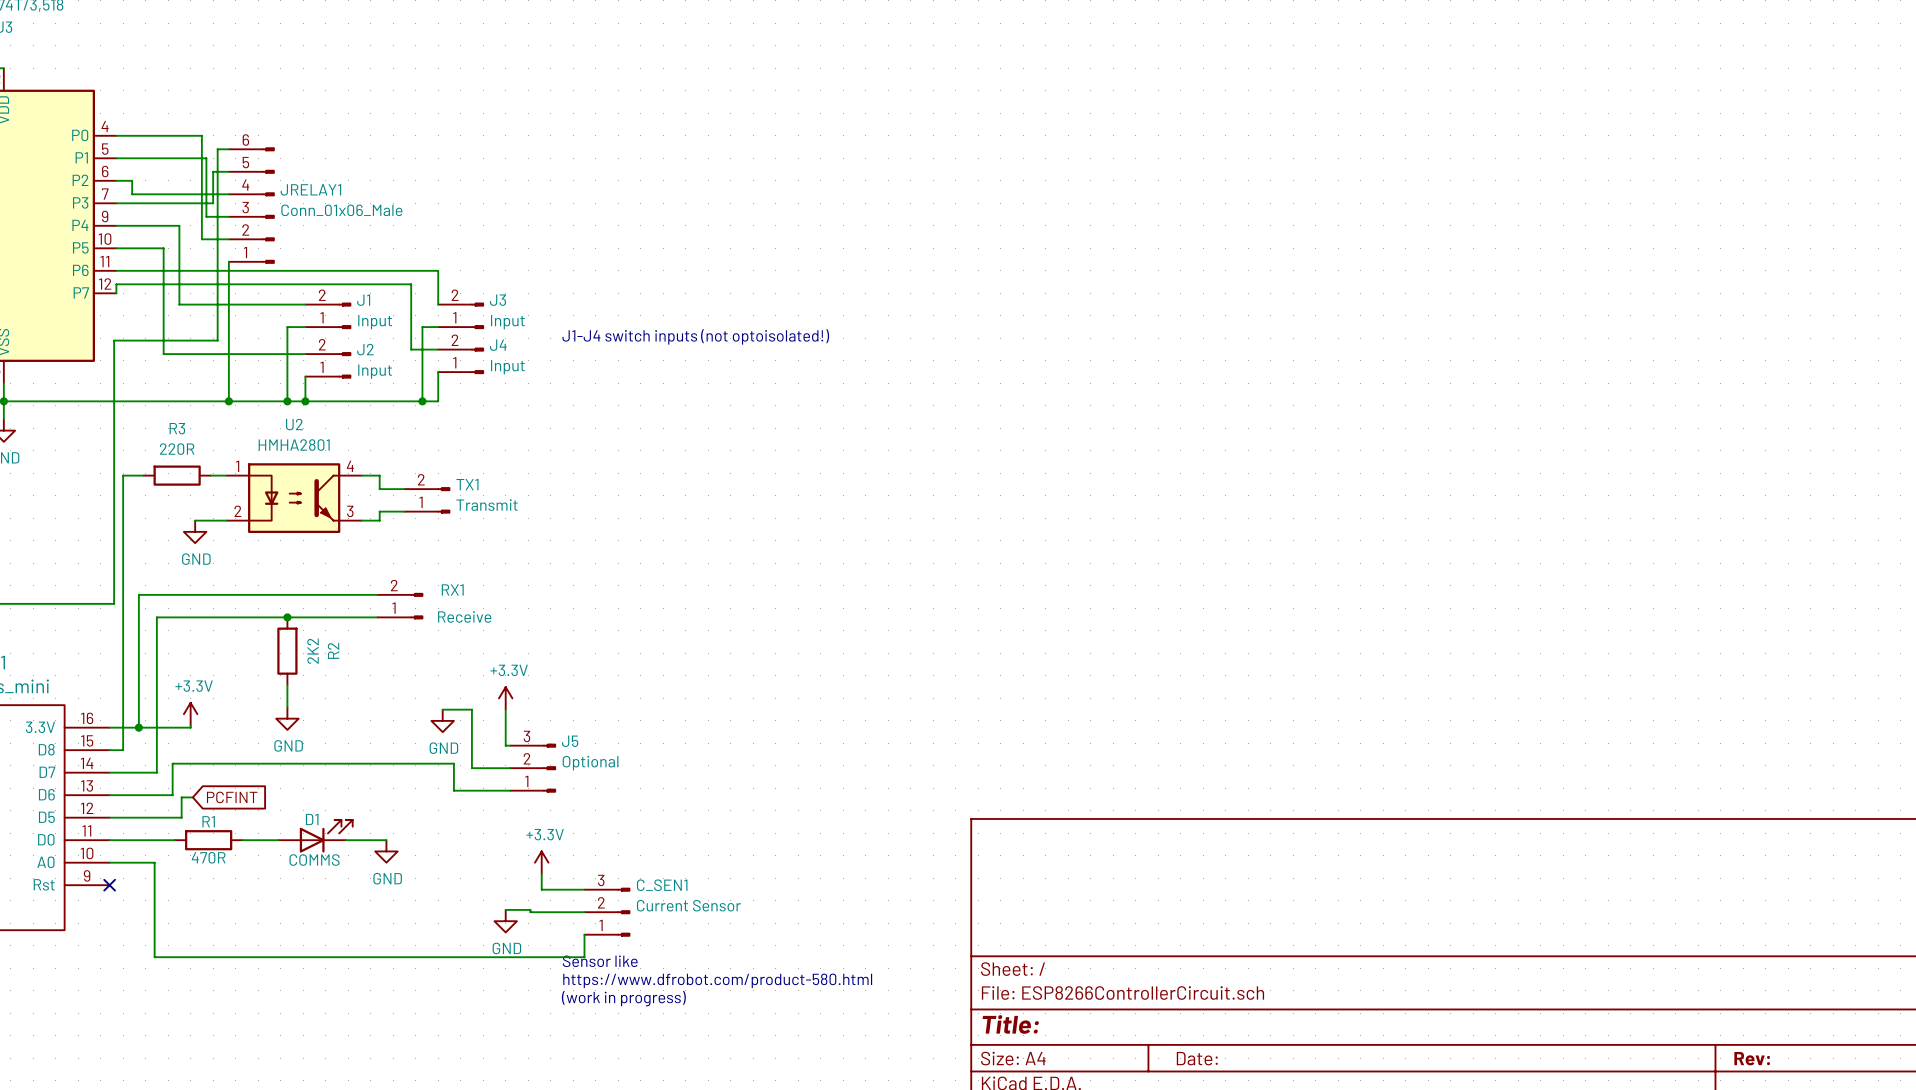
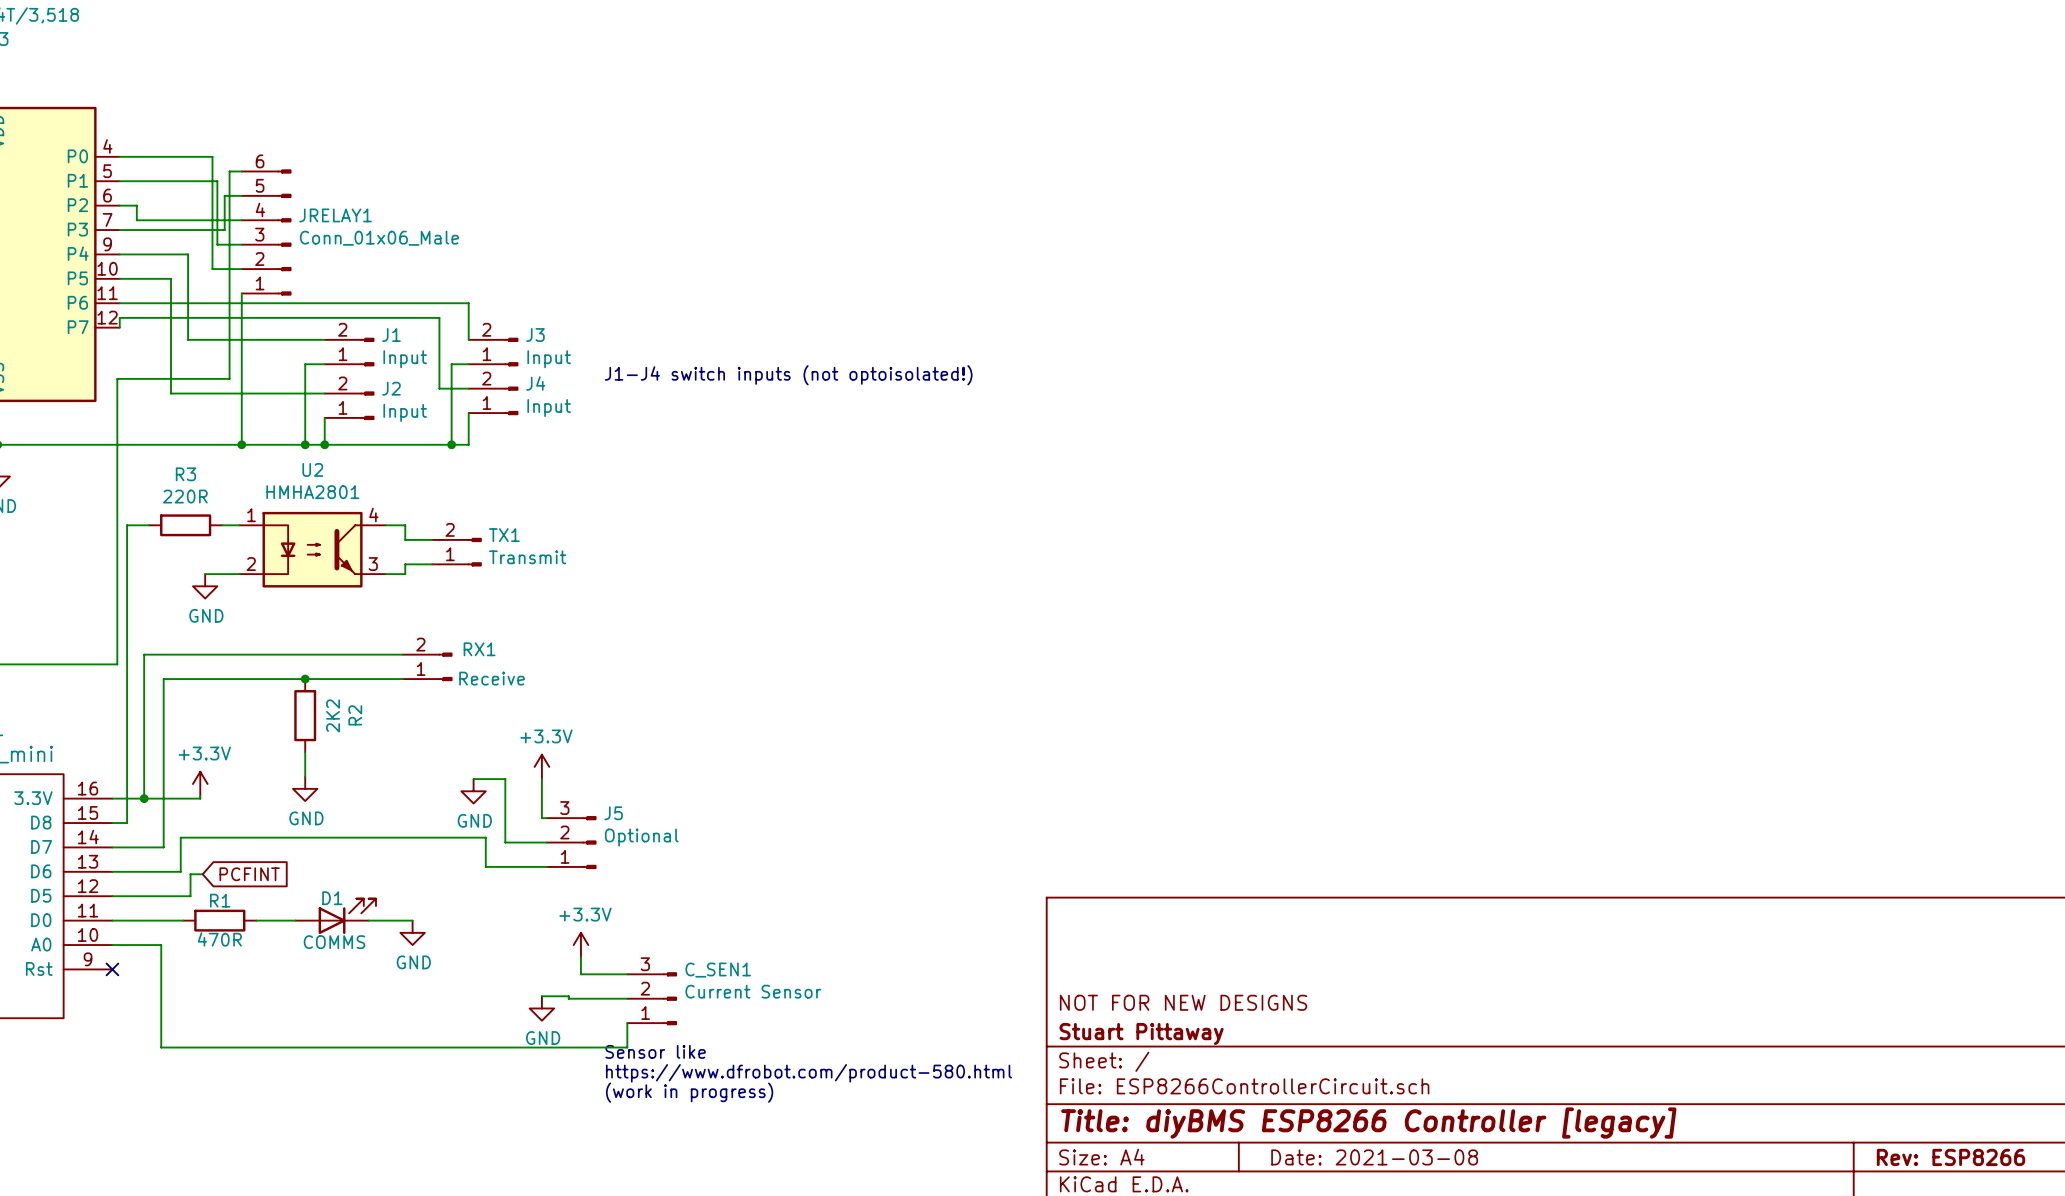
title block: none -> NOT FOR NEW DESIGNS (1183, 1002)
title block: none -> Stuart Pittaway (1141, 1033)
title block: Title: (1010, 1024) -> Title: diyBMS ESP8266 Controller [legacy] (1368, 1123)
title block: Date: (1197, 1058) -> Date: 2021-03-08 (1374, 1157)
title block: Rev: (1752, 1058) -> Rev: ESP8266 (1951, 1157)

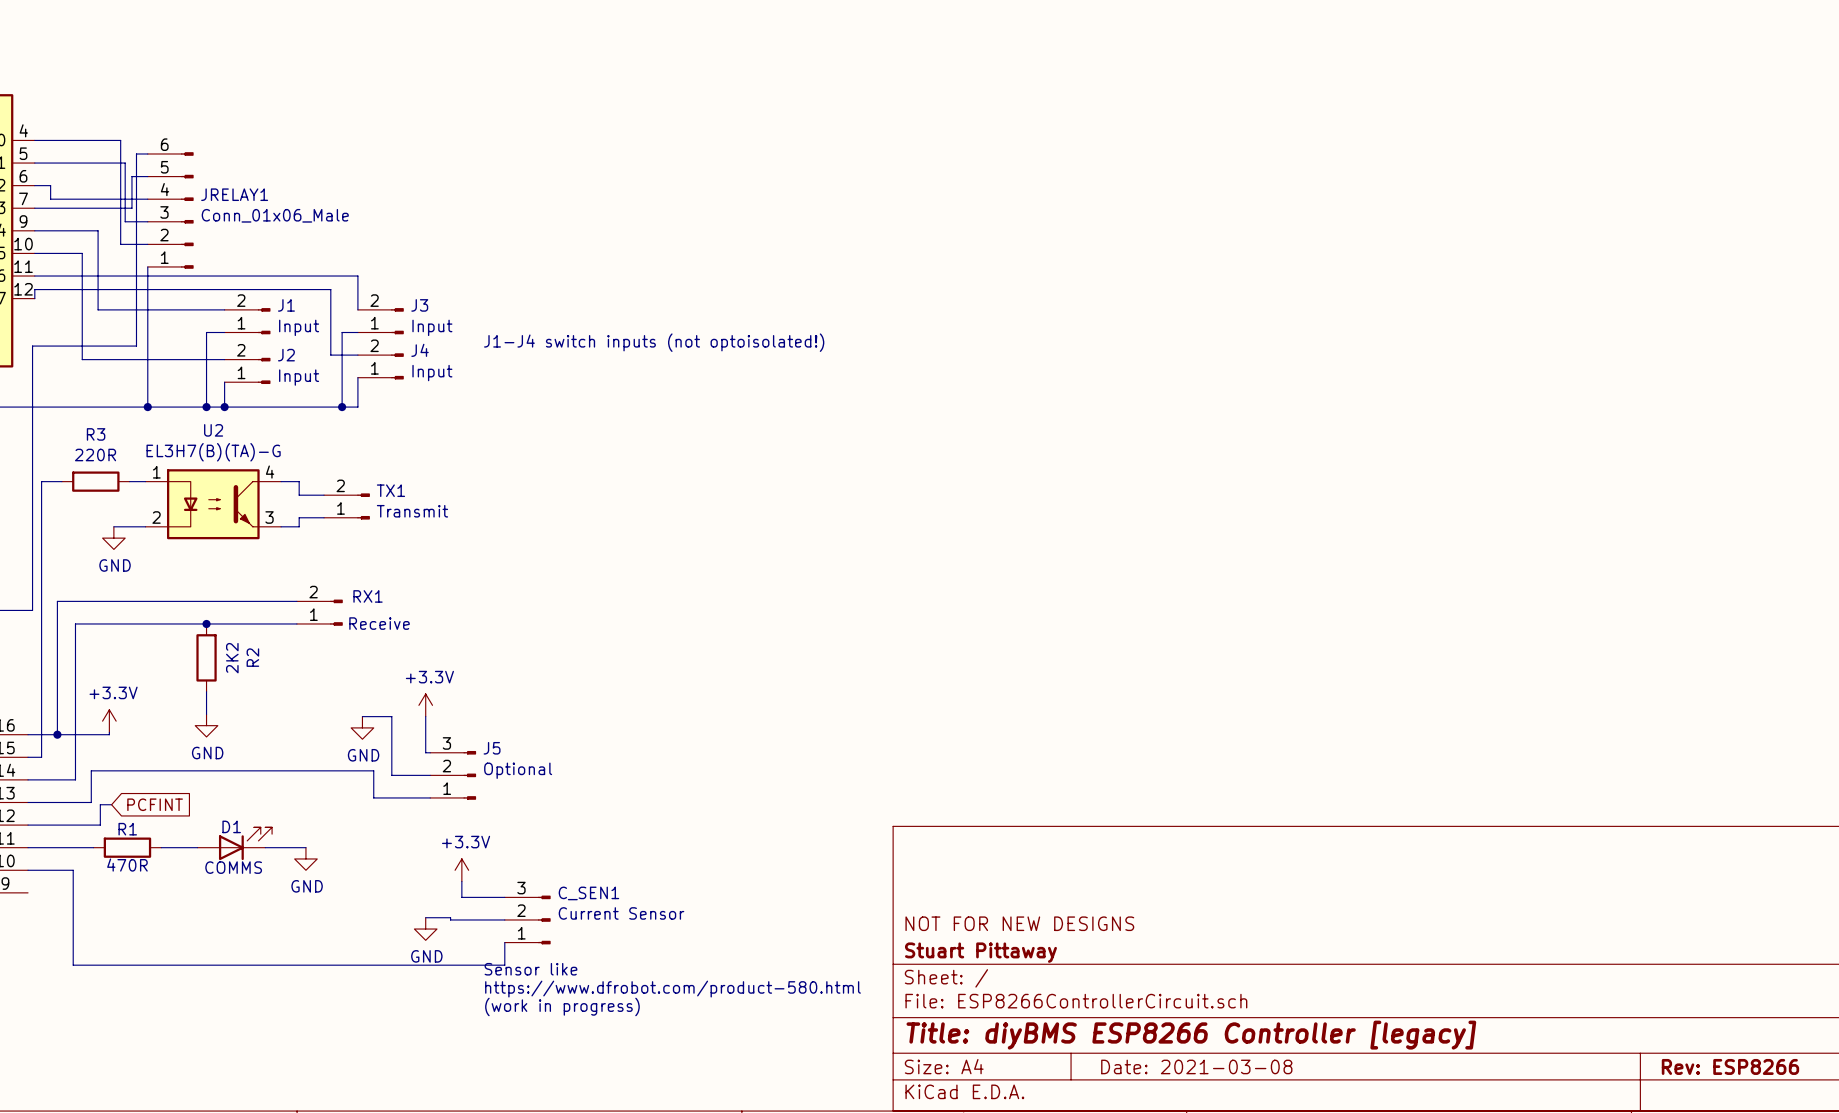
U2 value: HMHA2801 (312, 492) -> EL3H7(B)(TA)-G (213, 452)
no-connect mark: (112, 969) -> none

